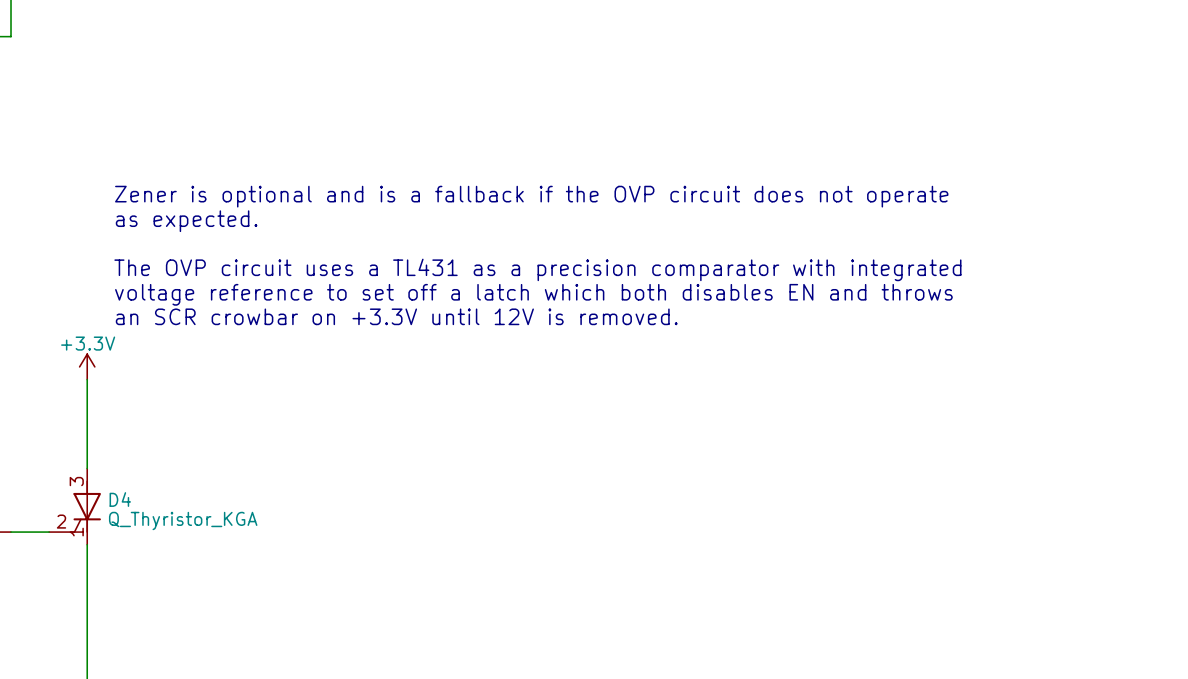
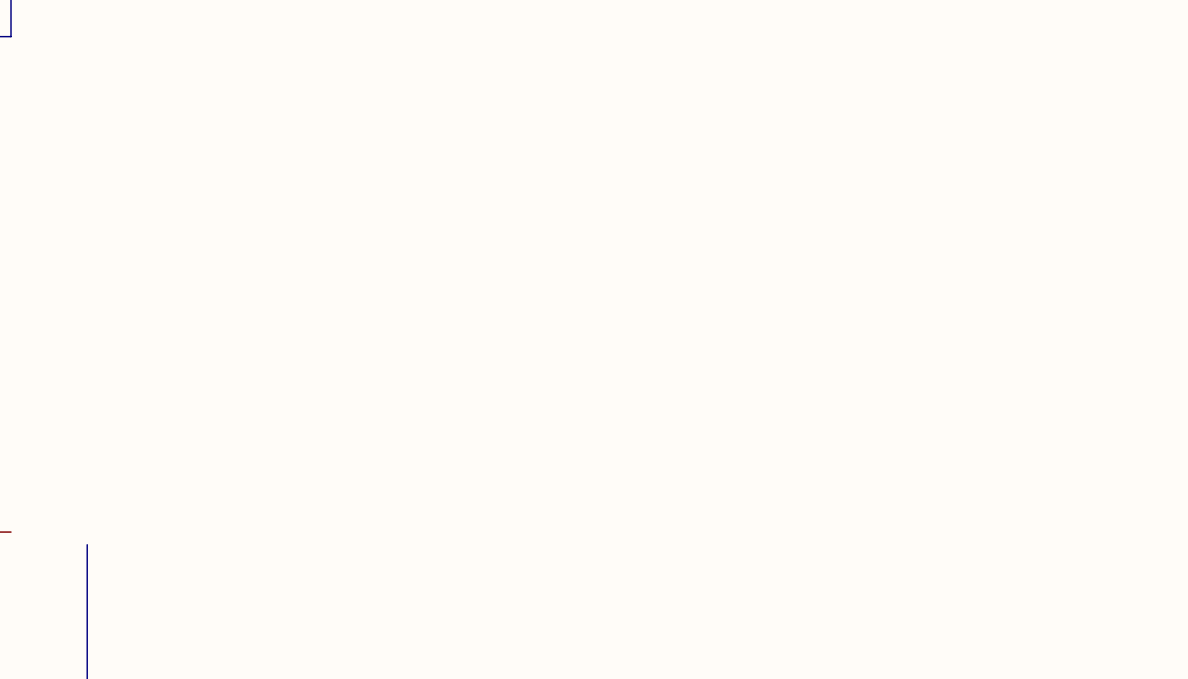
text: Zener is optional and is a fallback if the OVP circuit does not operate (531, 196) -> none
text: as expected. (186, 221) -> none
text: The OVP circuit uses a TL431 as a precision comparator with integrated (537, 269) -> none
text: voltage reference to set off a latch which both disables EN and throws (533, 294) -> none
text: an SCR crowbar on +3.3V until 12V is removed. (396, 316) -> none
power symbol: +3.3V (87, 366) -> none
wire: (87, 379) (87, 468) -> none
D4: Q_Thyristor_KGA (75, 506) -> none
wire: (11, 532) (49, 532) -> none

